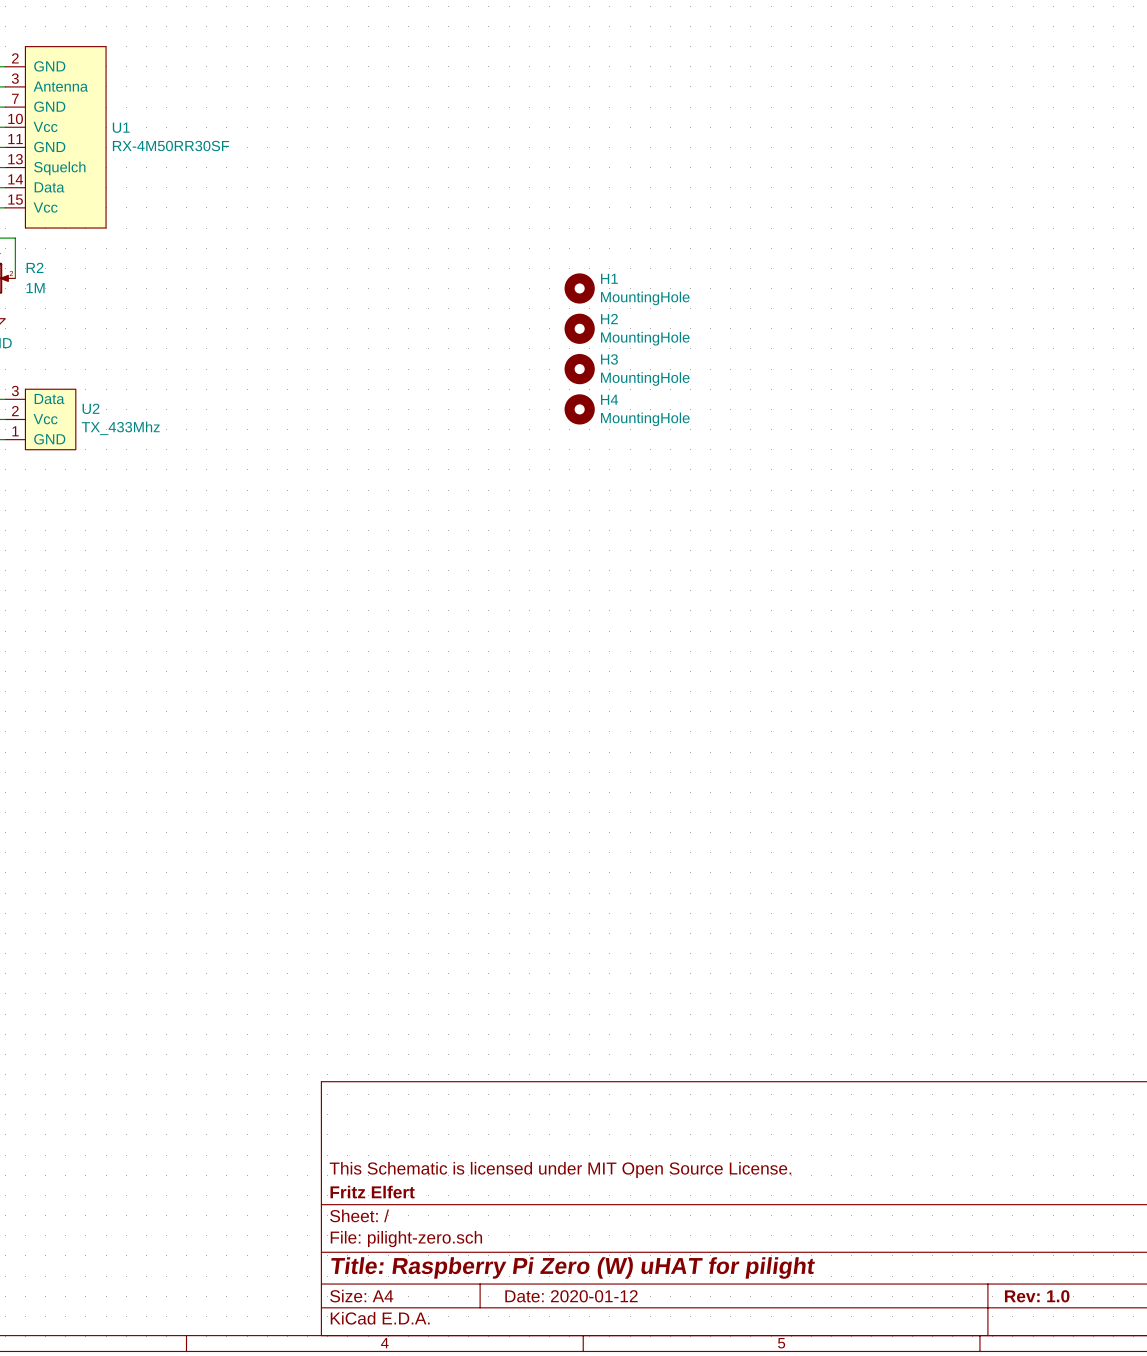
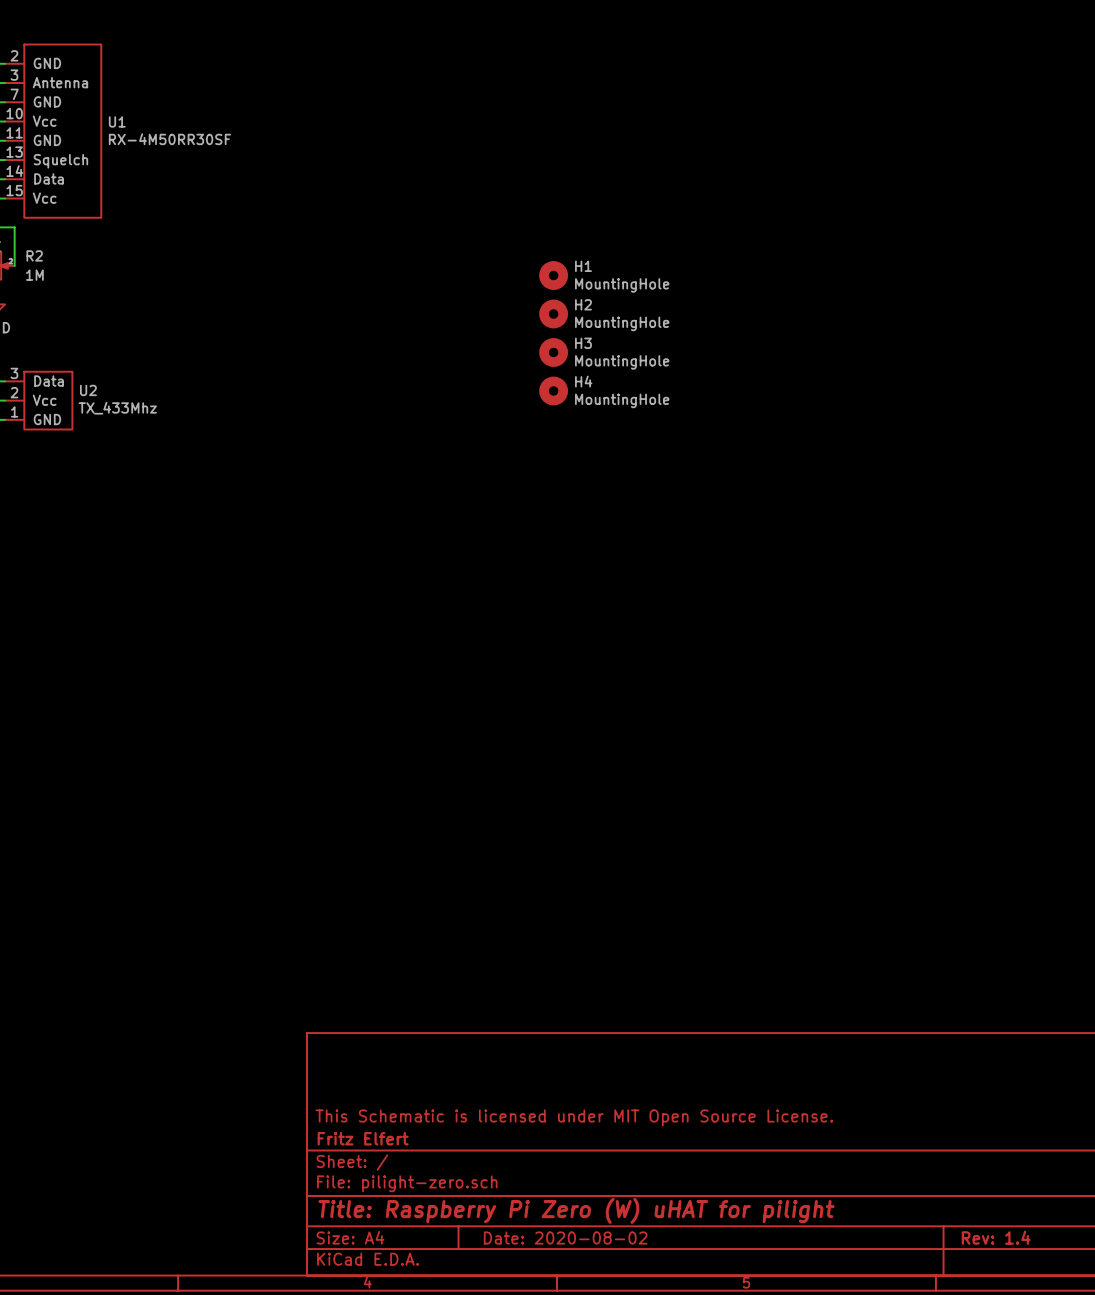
title block: Date: 2020-01-12 (571, 1296) -> Date: 2020-08-02 (565, 1238)
title block: Rev: 1.0 (1037, 1296) -> Rev: 1.4 (996, 1237)

